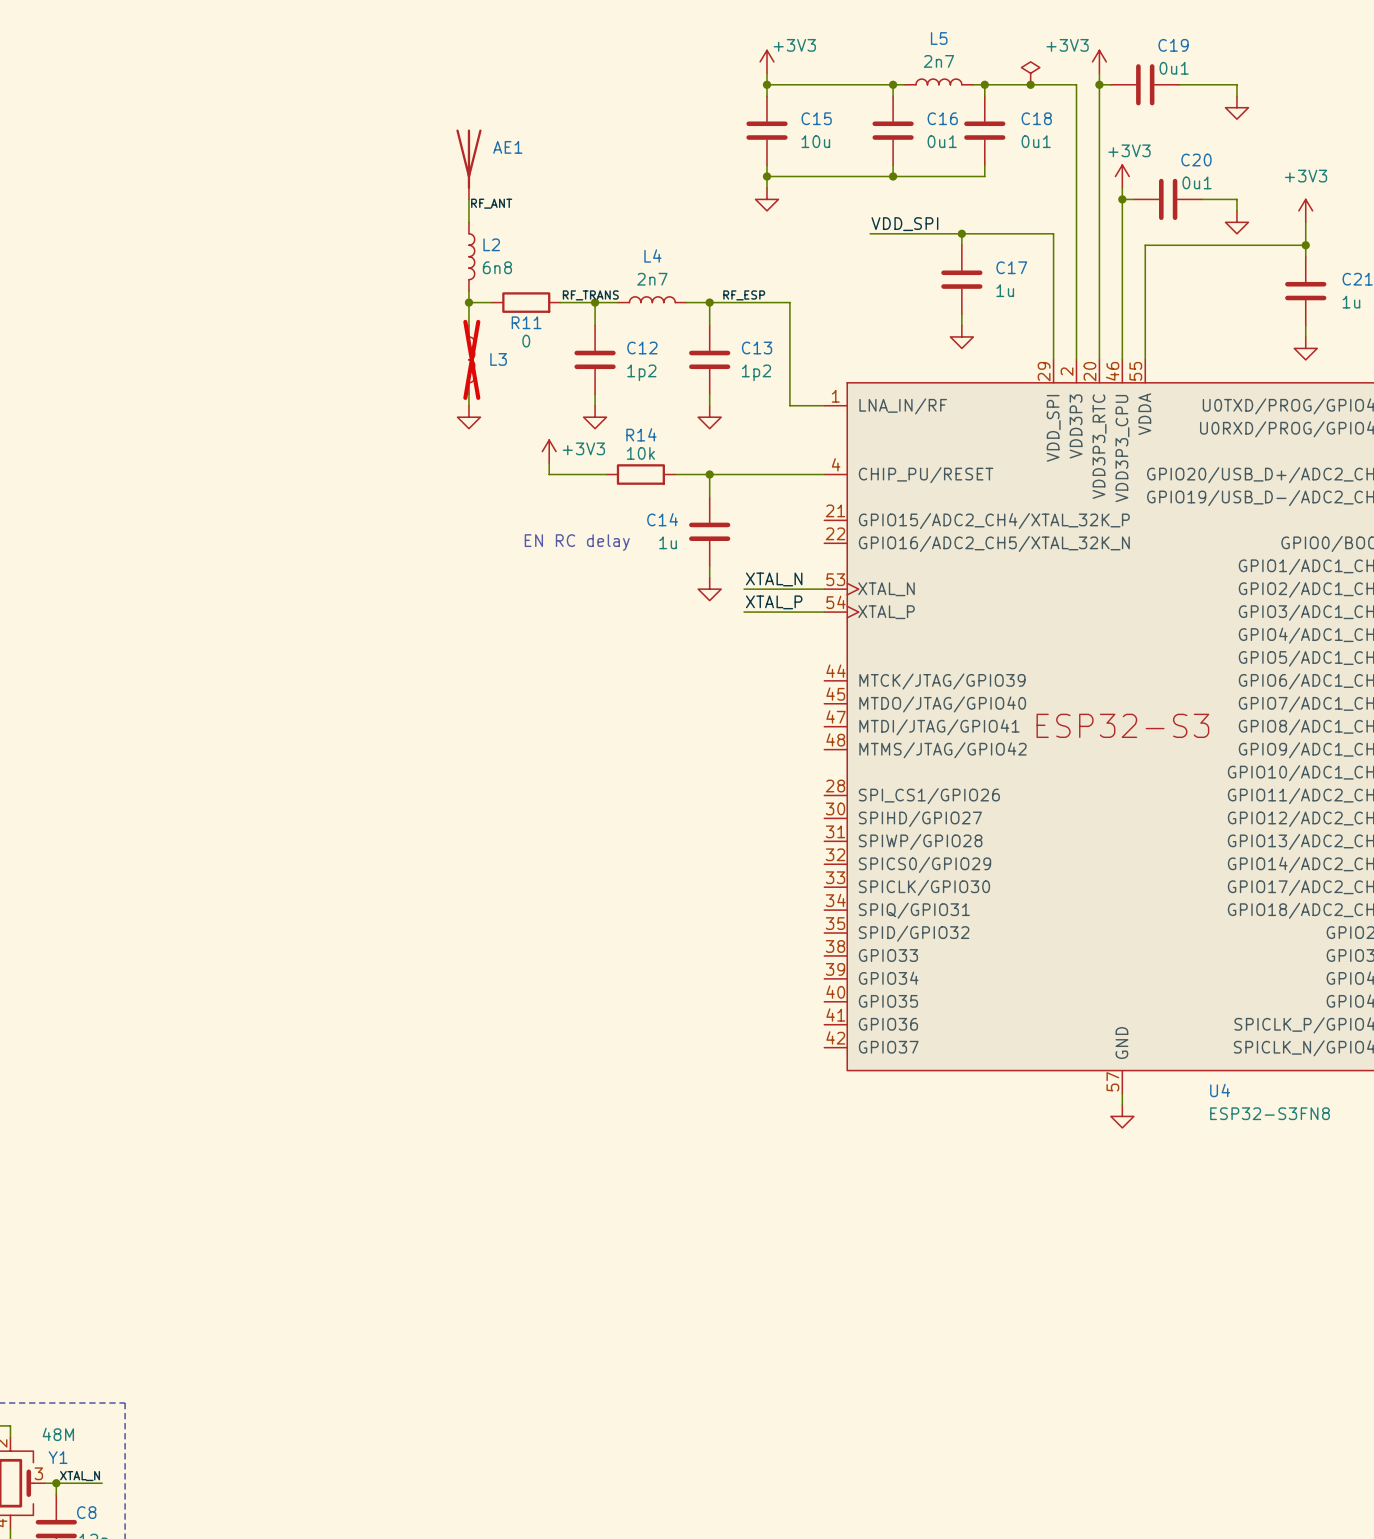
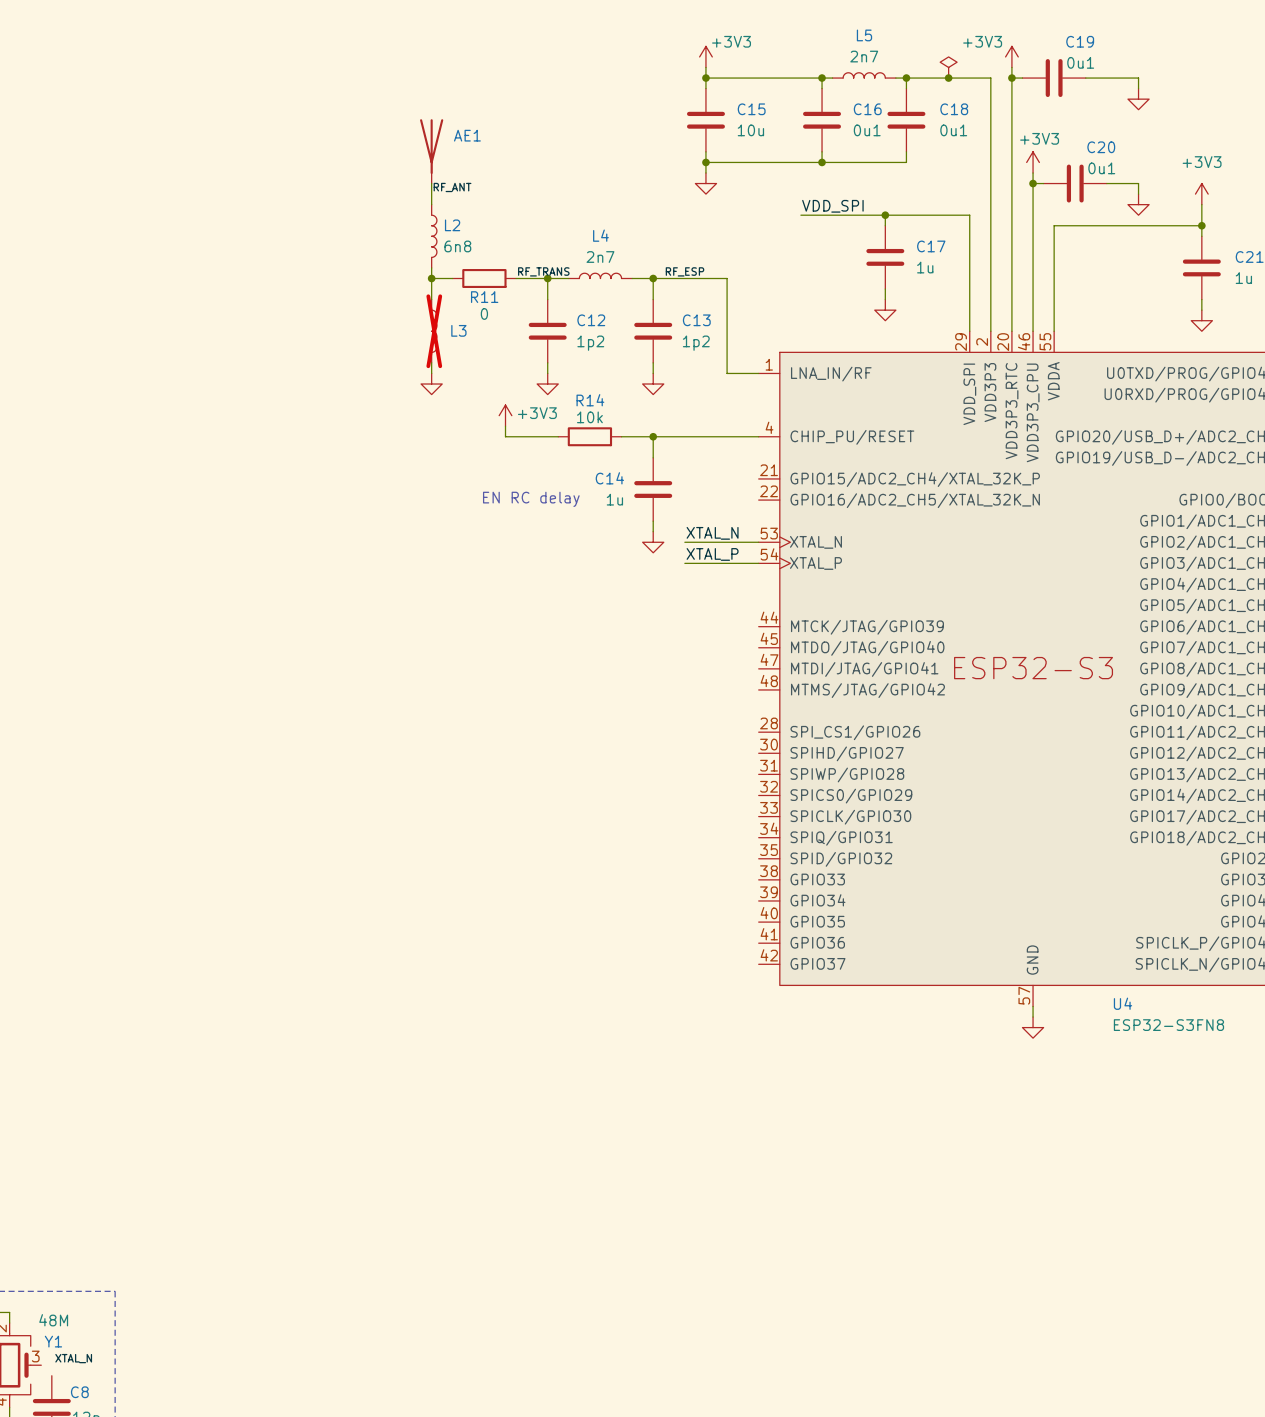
wire: (44, 1483) (102, 1483) -> none
wire: (56, 1483) (56, 1494) -> none
junction: (56, 1483) -> none

